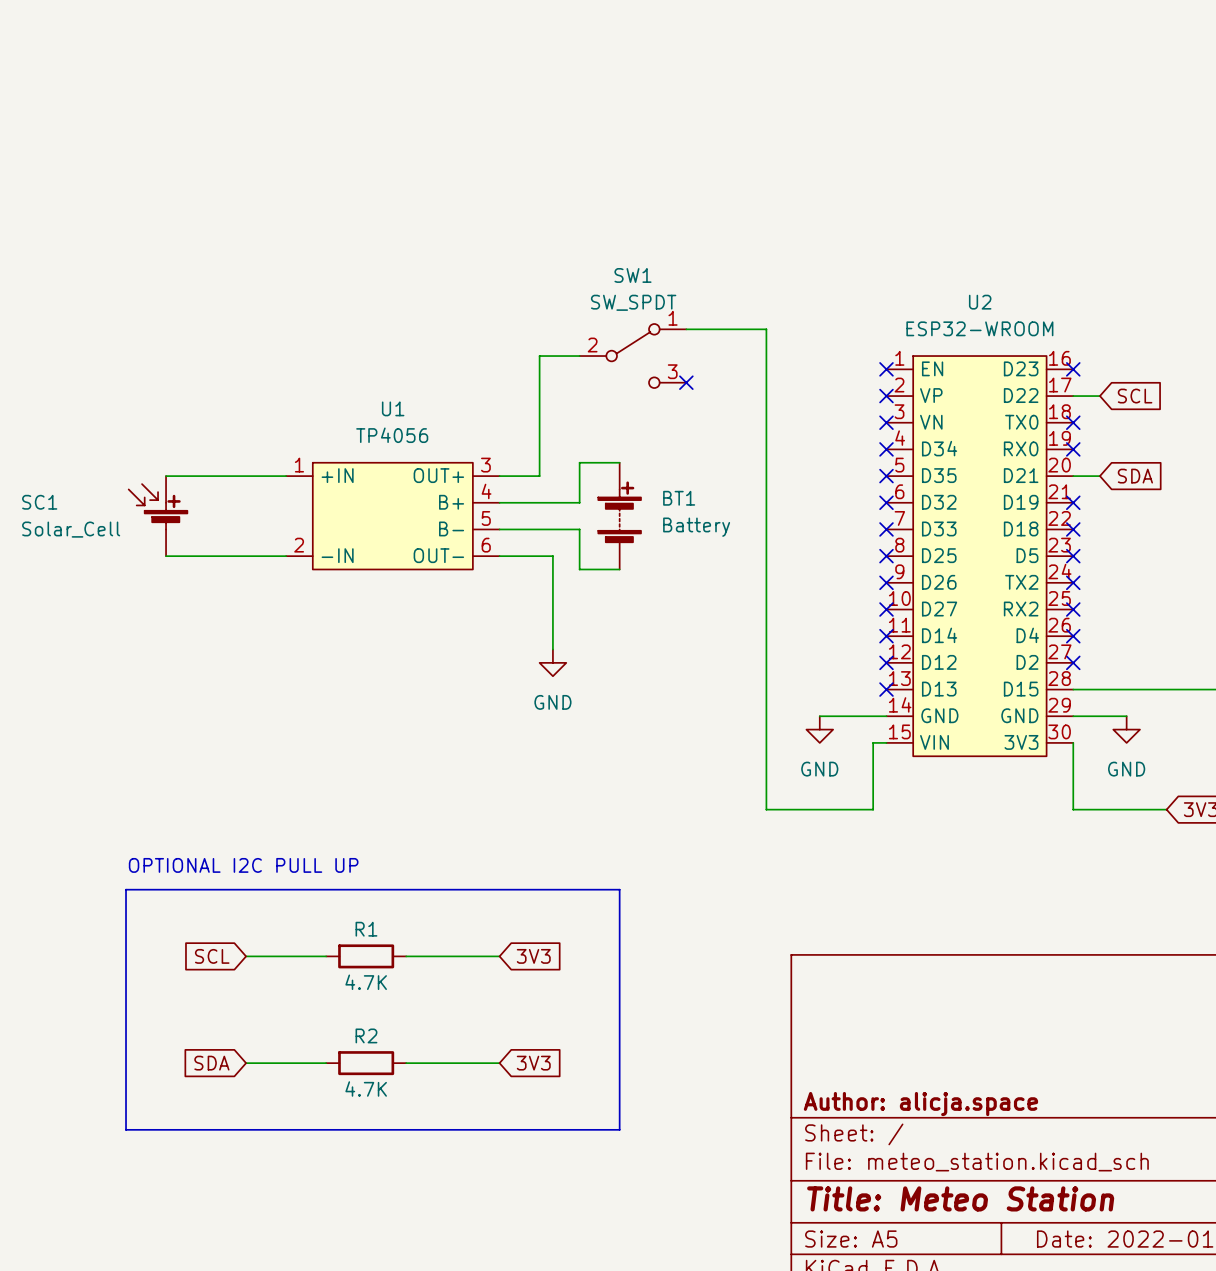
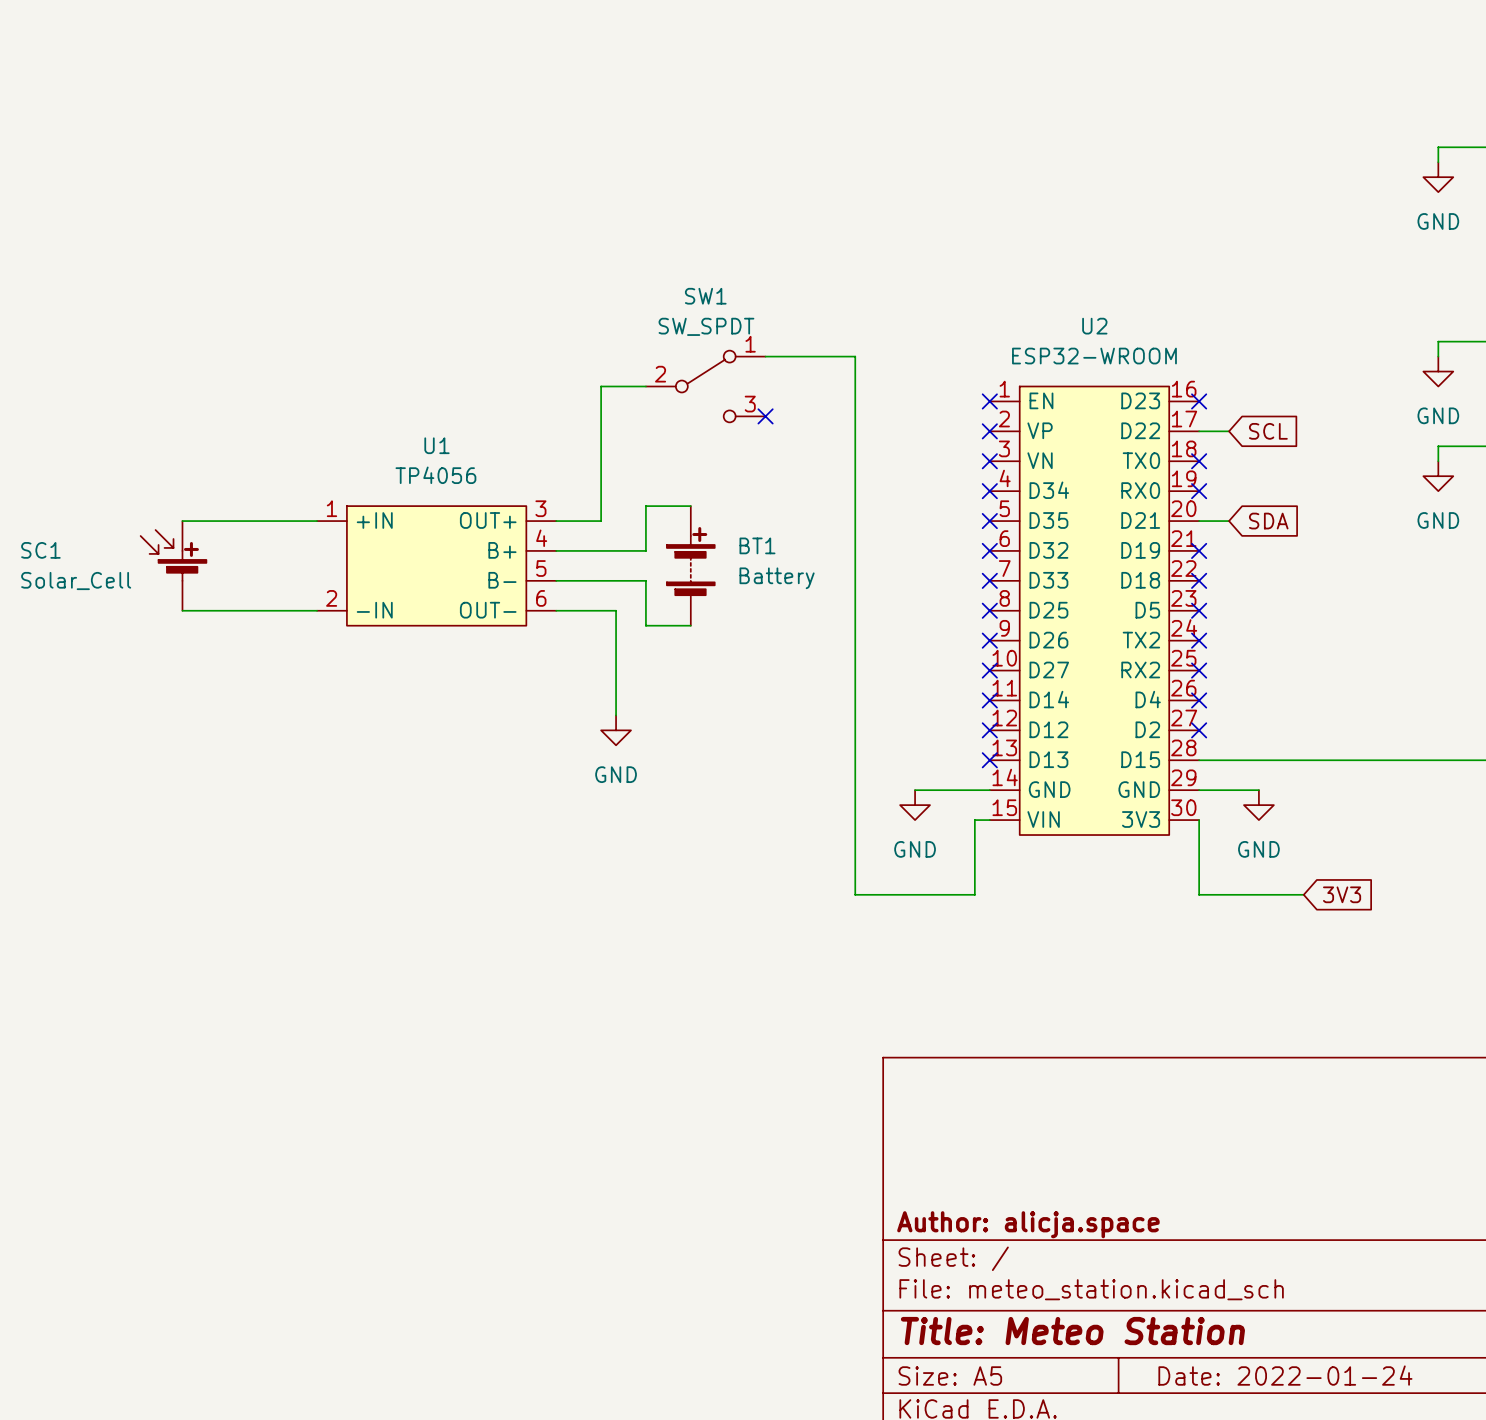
text: OPTIONAL I2C PULL UP (243, 865) -> none
line: (126, 889) (126, 1129) (619, 1129) (619, 889) (126, 889) -> none
global label: SCL (212, 956) -> none
wire: (246, 956) (326, 956) -> none
R1: 4.7K (366, 956) -> none
wire: (406, 956) (499, 956) -> none
global label: 3V3 (533, 956) -> none
global label: SDA (211, 1063) -> none
wire: (246, 1063) (326, 1063) -> none
R2: 4.7K (366, 1063) -> none
wire: (406, 1063) (499, 1063) -> none
global label: 3V3 (533, 1063) -> none

